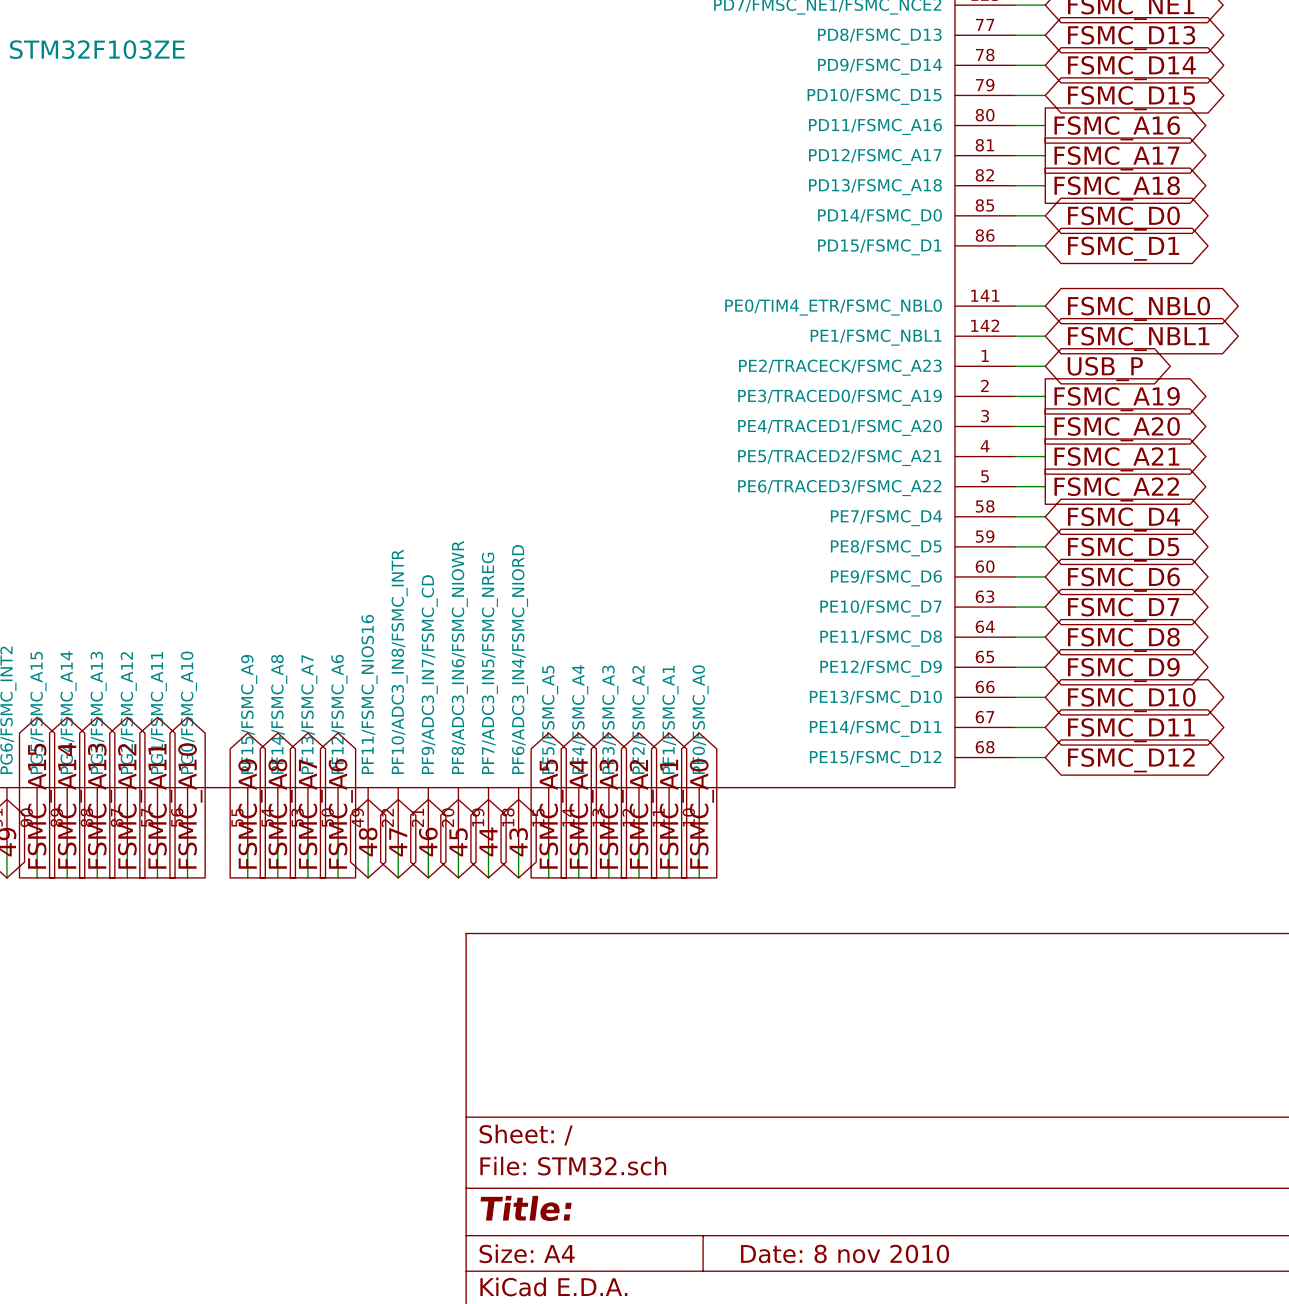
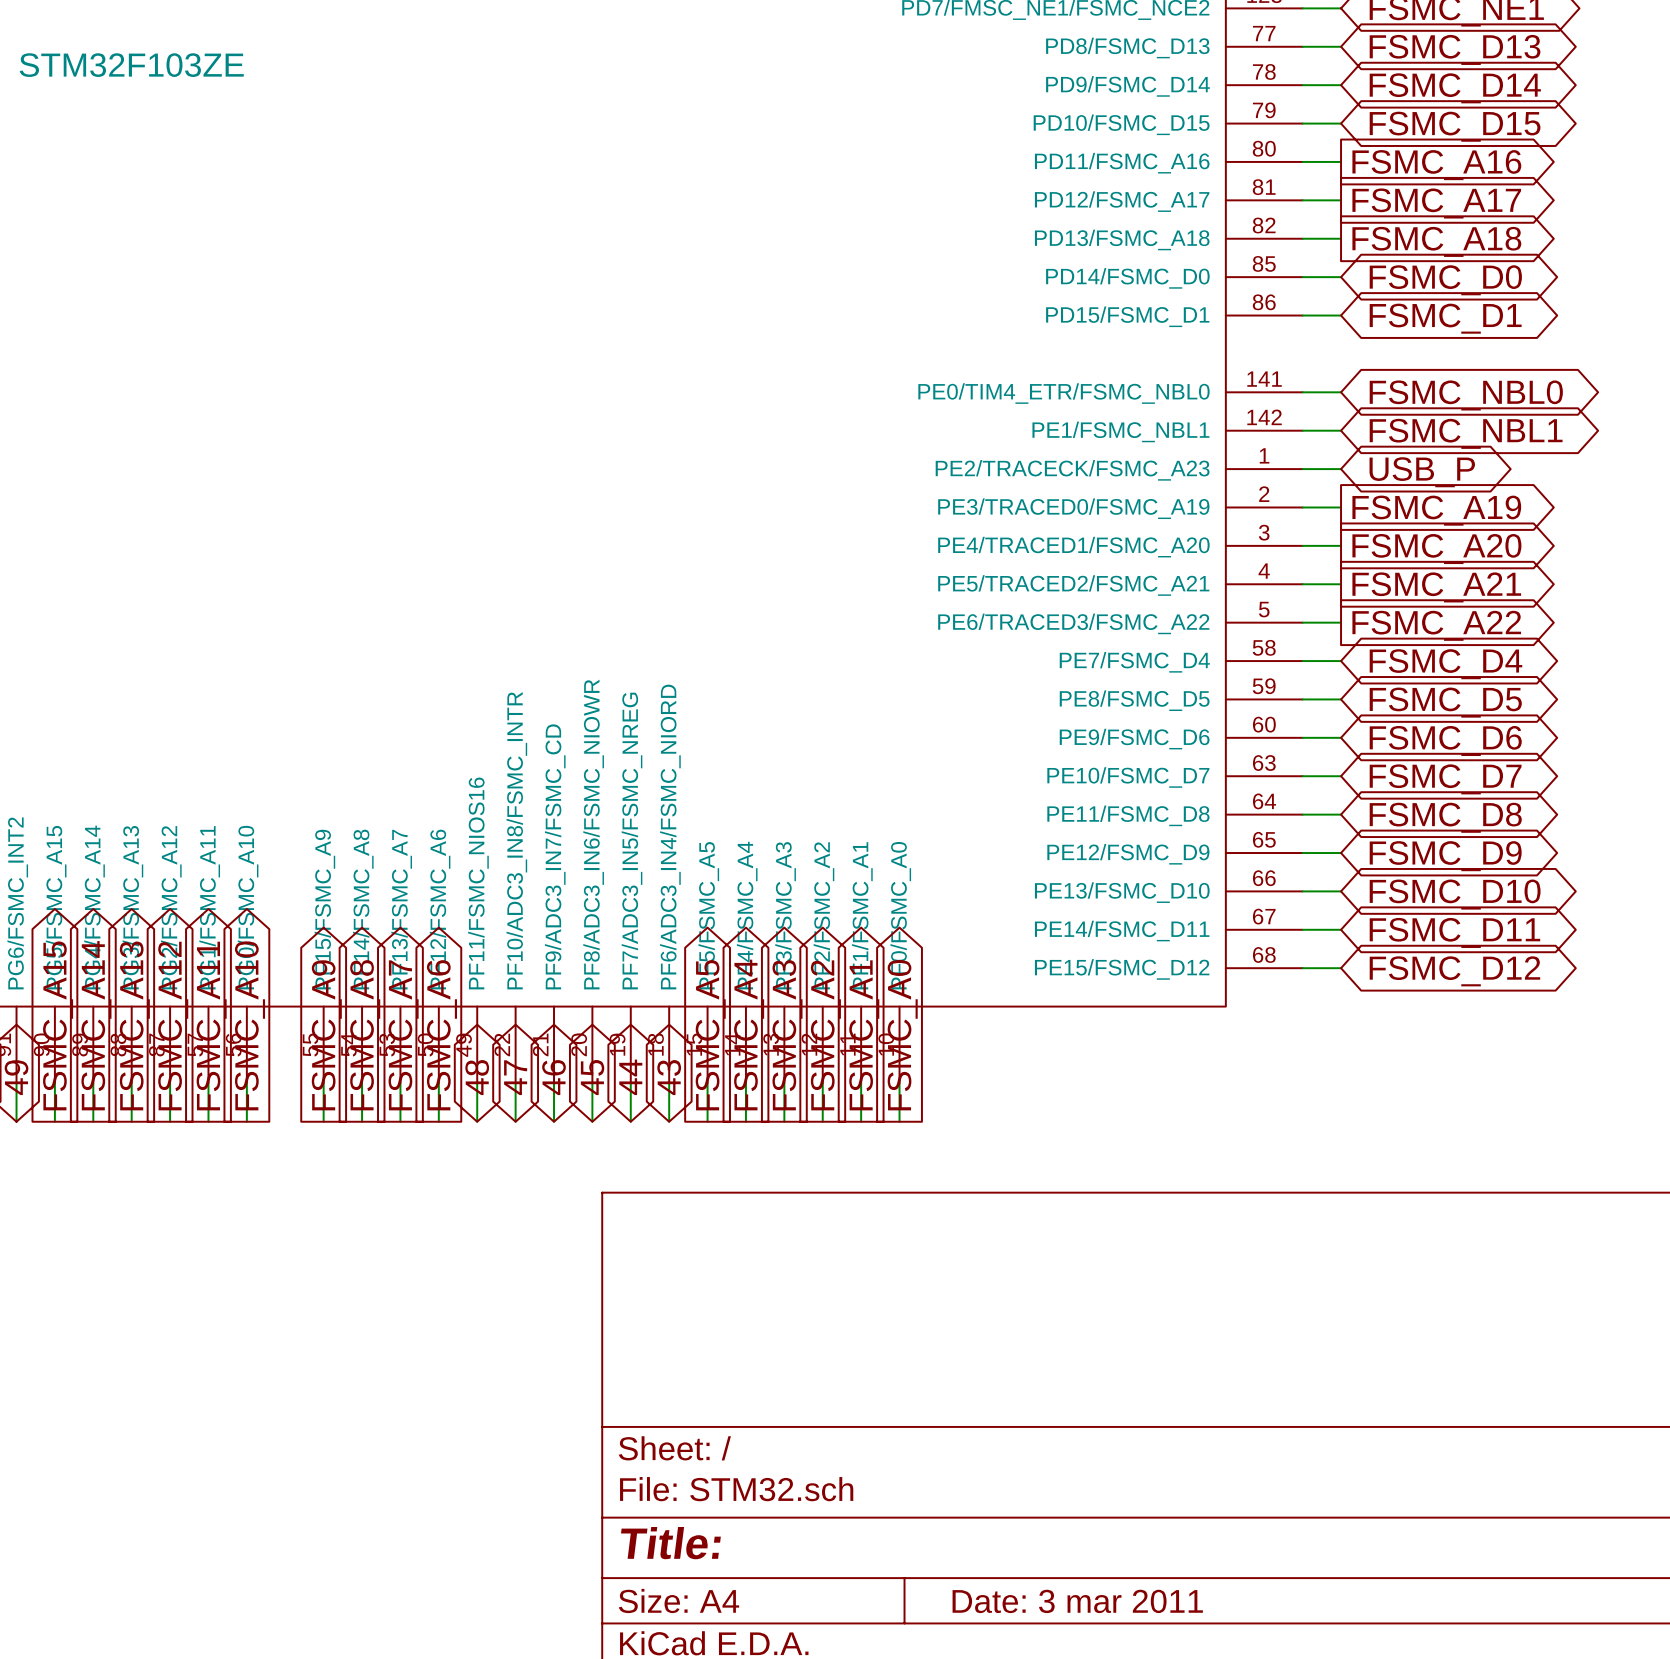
title block: Date: 8 nov 2010 (845, 1253) -> Date: 3 mar 2011 (1077, 1601)

